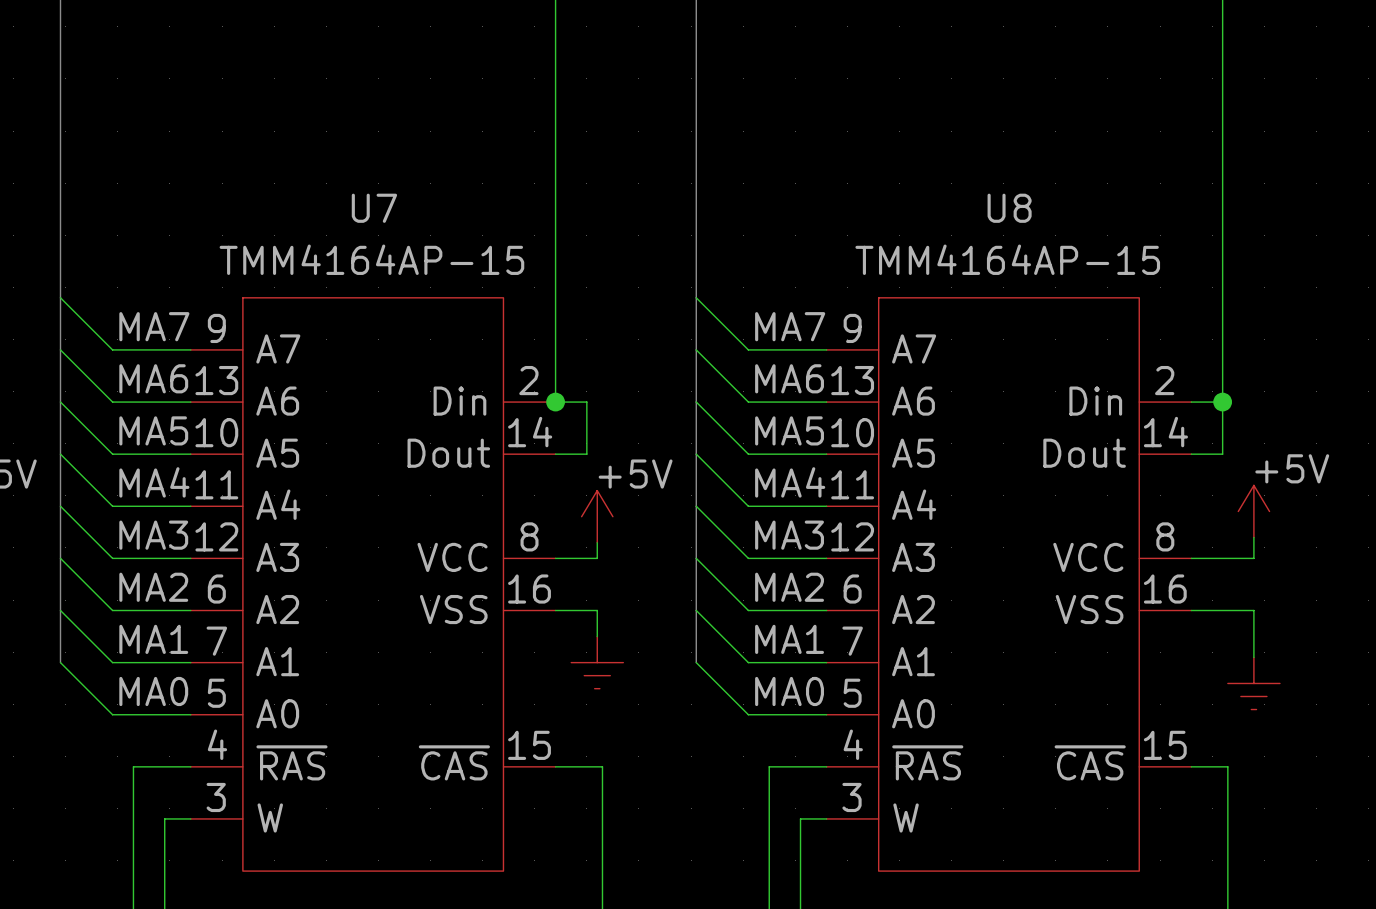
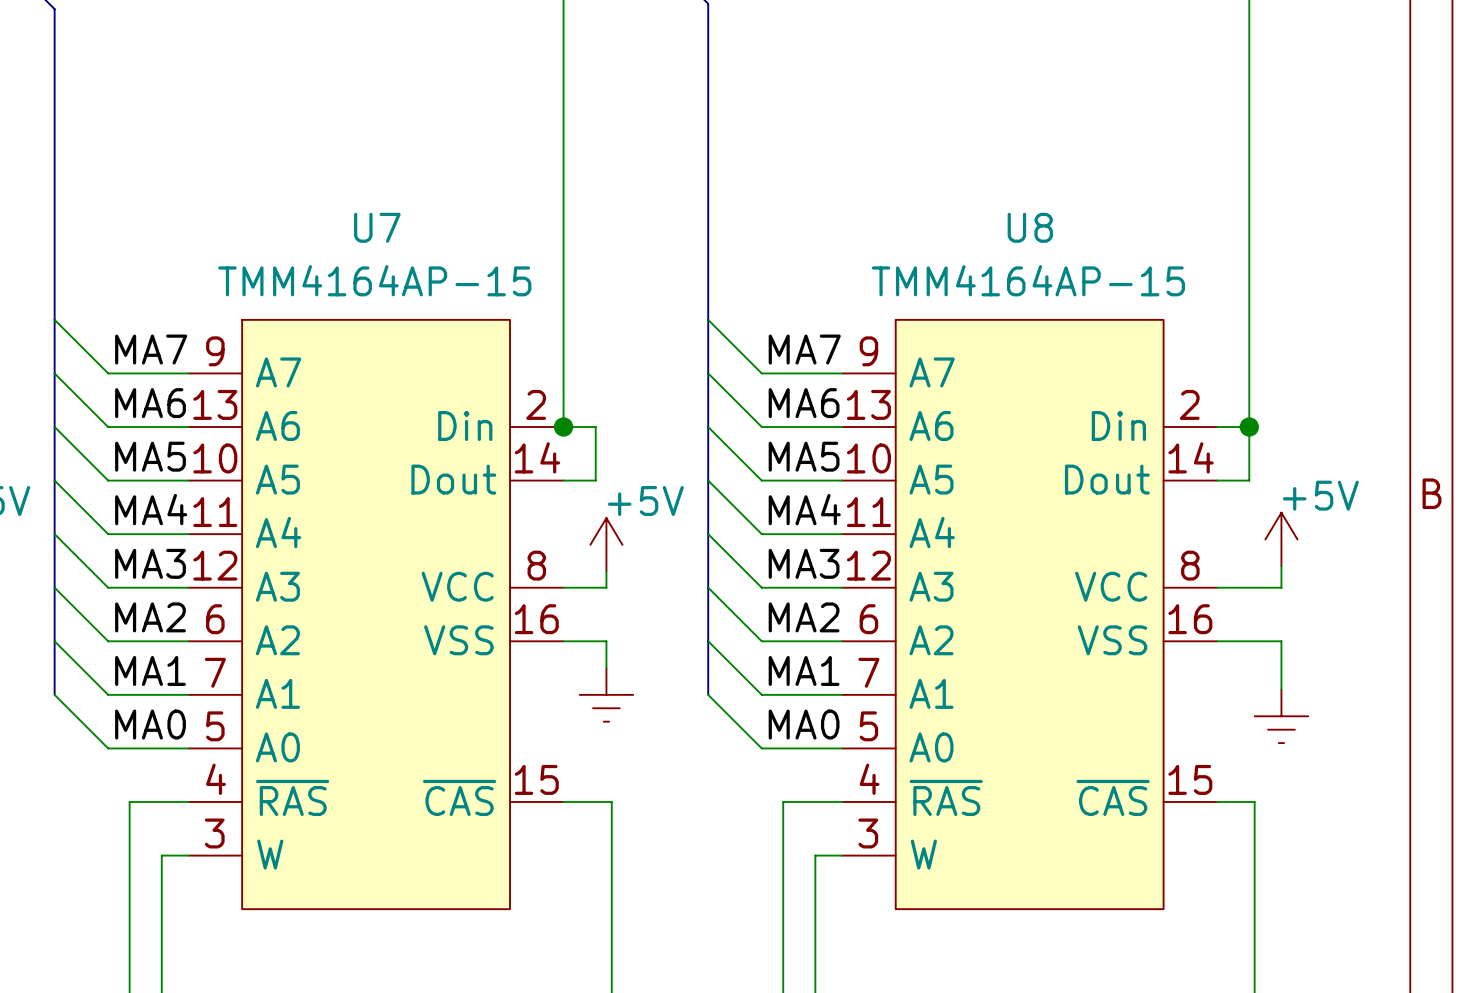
U7 symbol: [190, 297, 556, 872] -> [188, 319, 564, 910]
U8 symbol: [826, 297, 1192, 872] -> [842, 319, 1218, 910]

